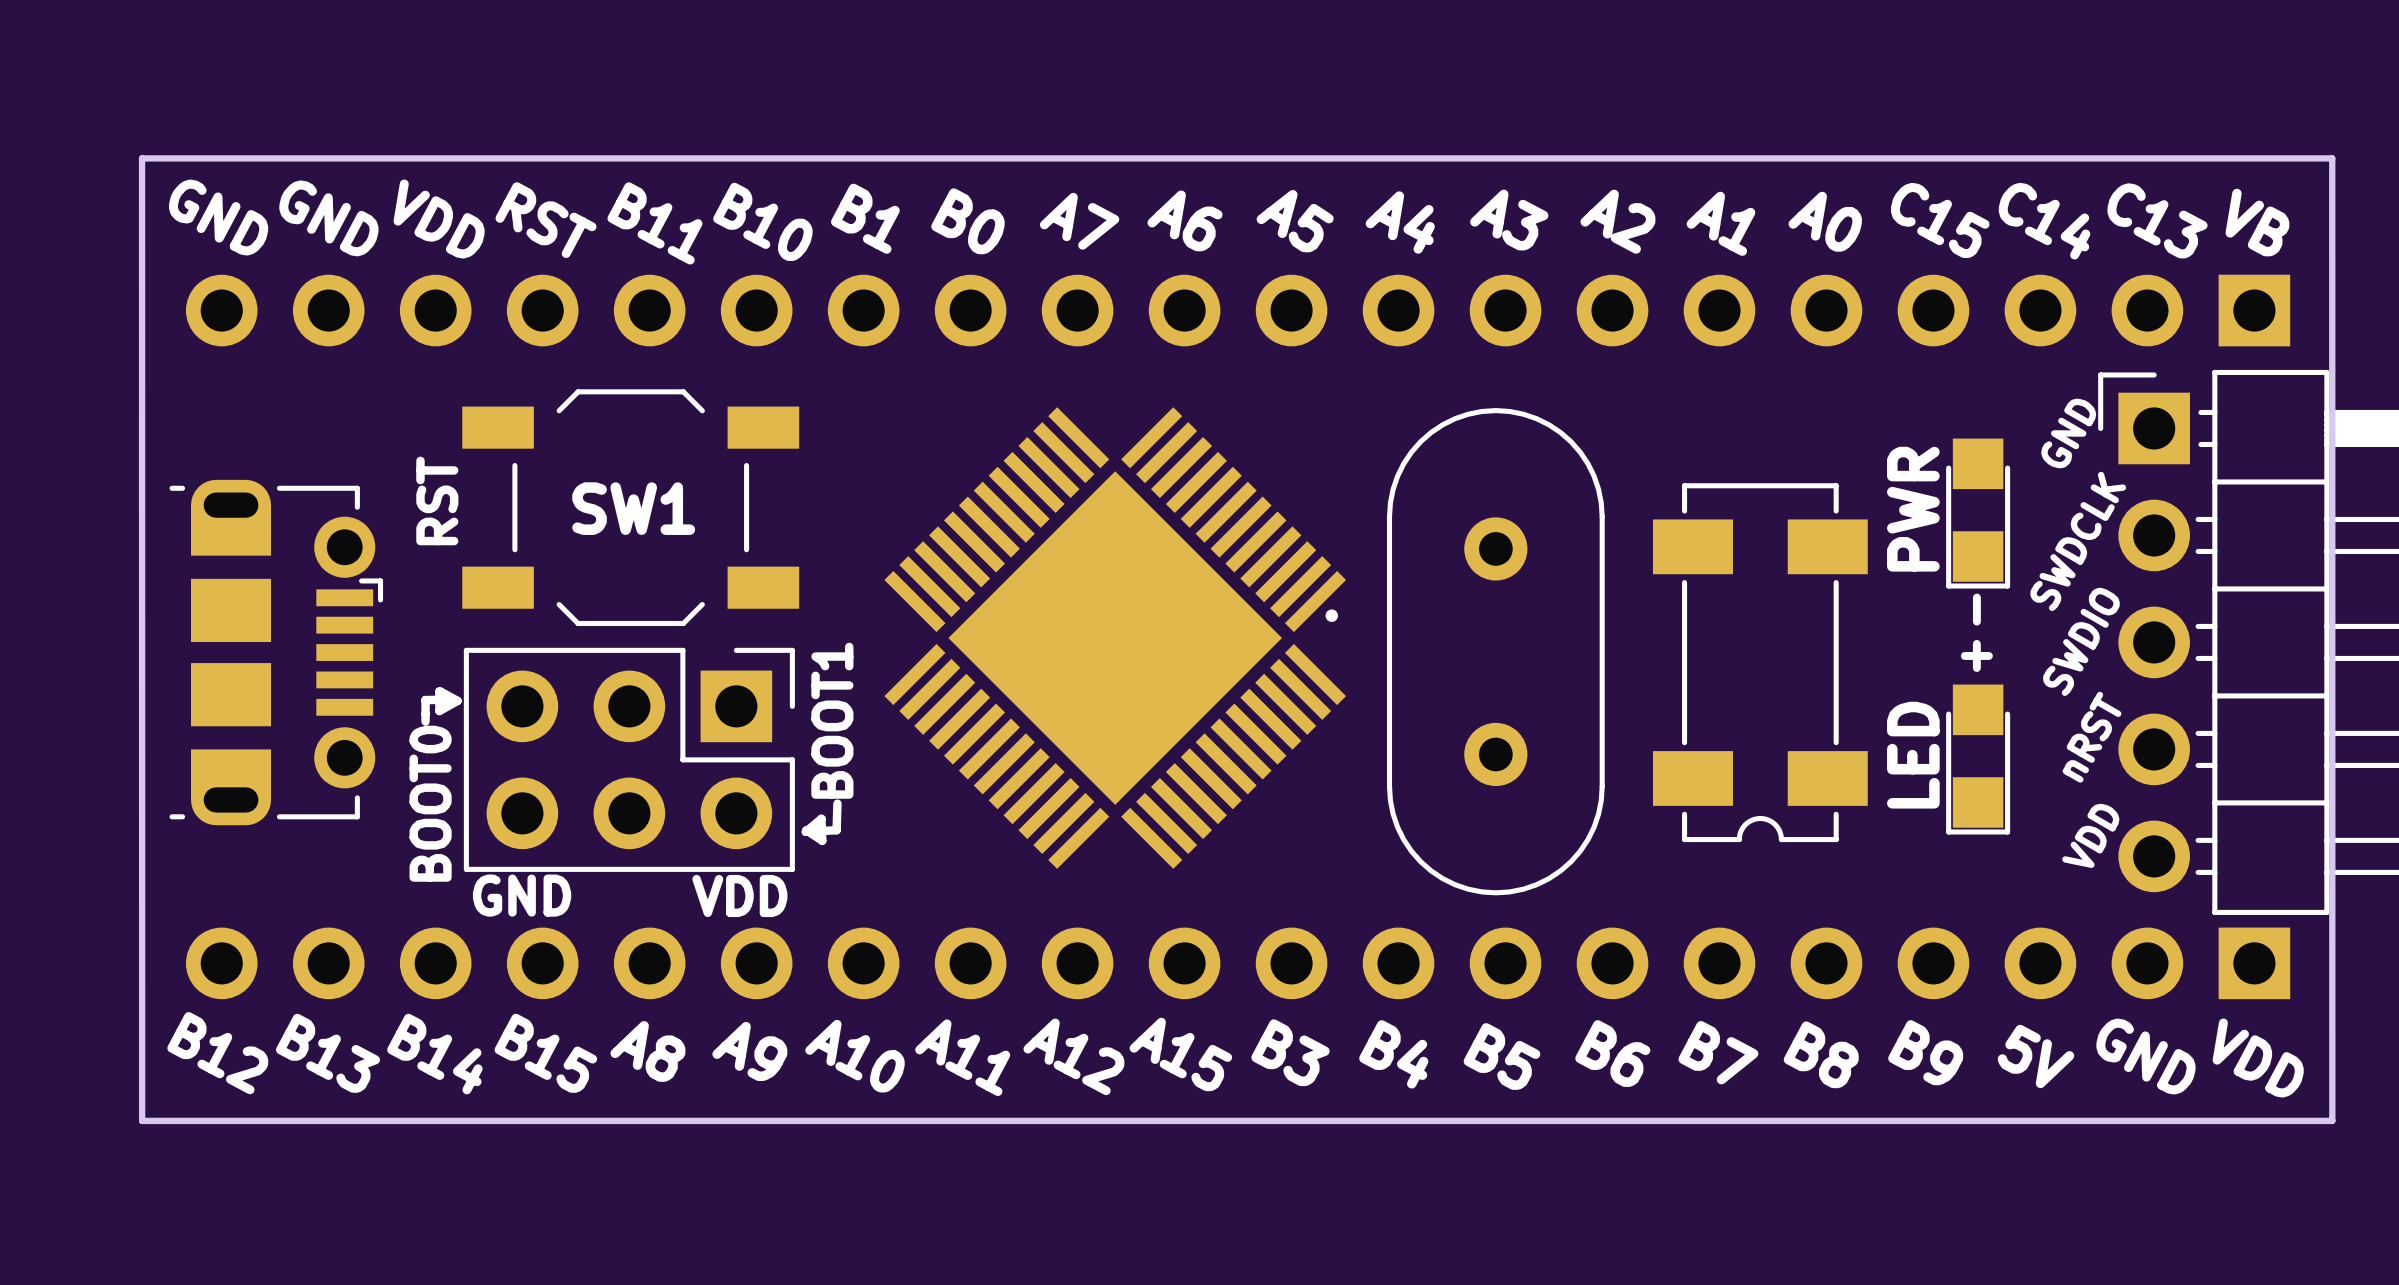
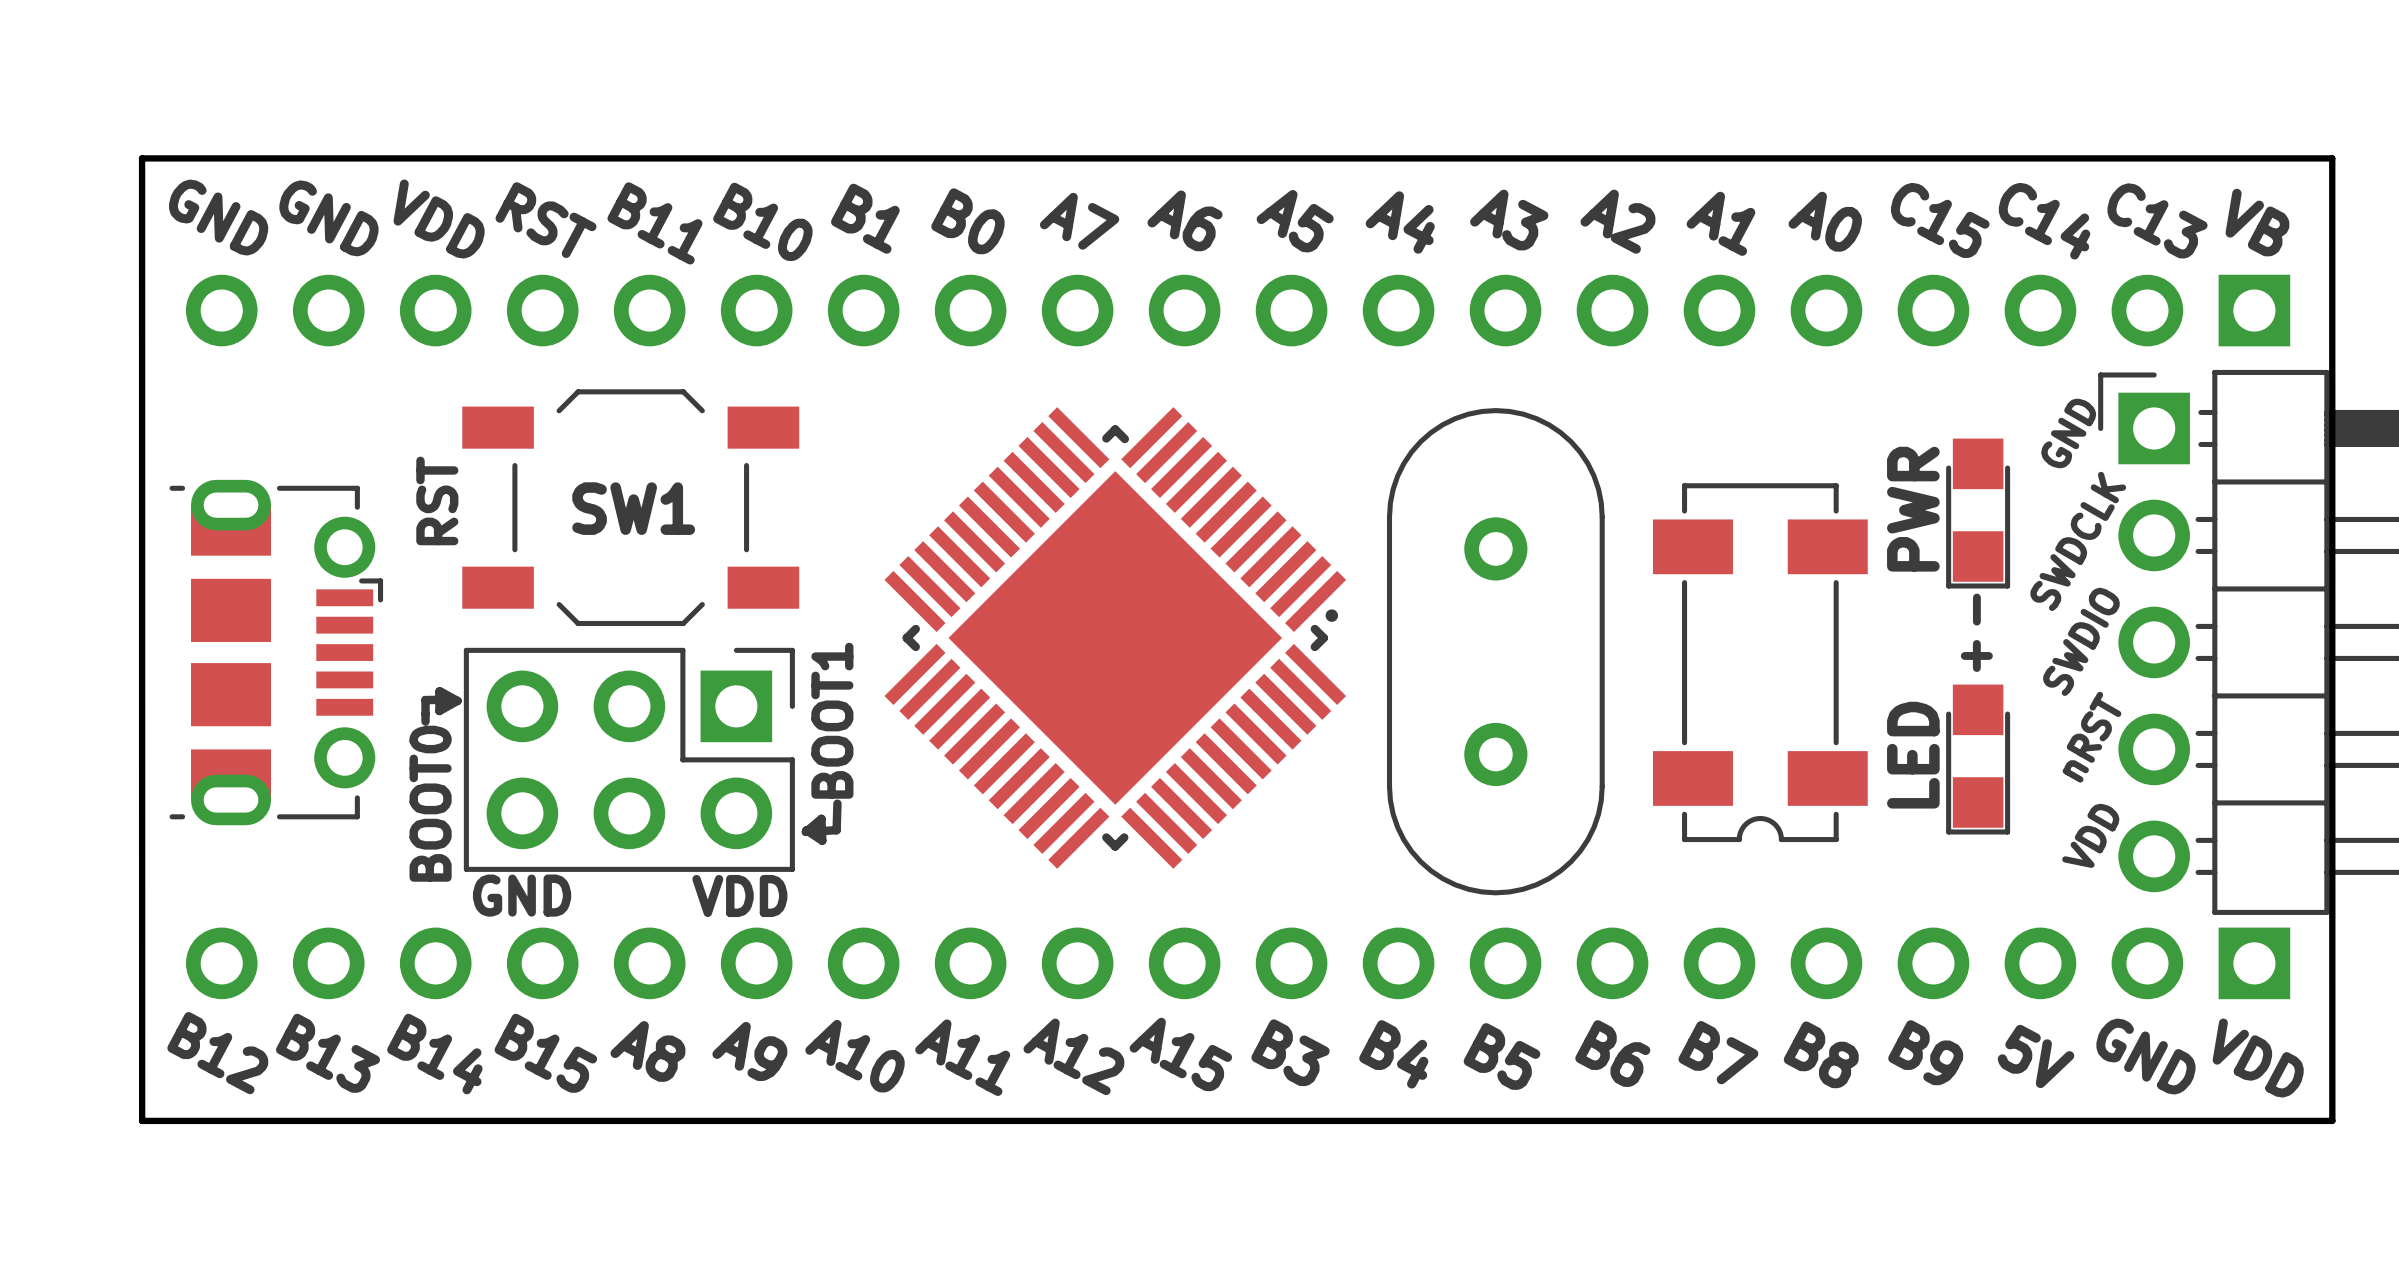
part footprint: [884, 407, 1347, 869] -> [884, 407, 1347, 869]

